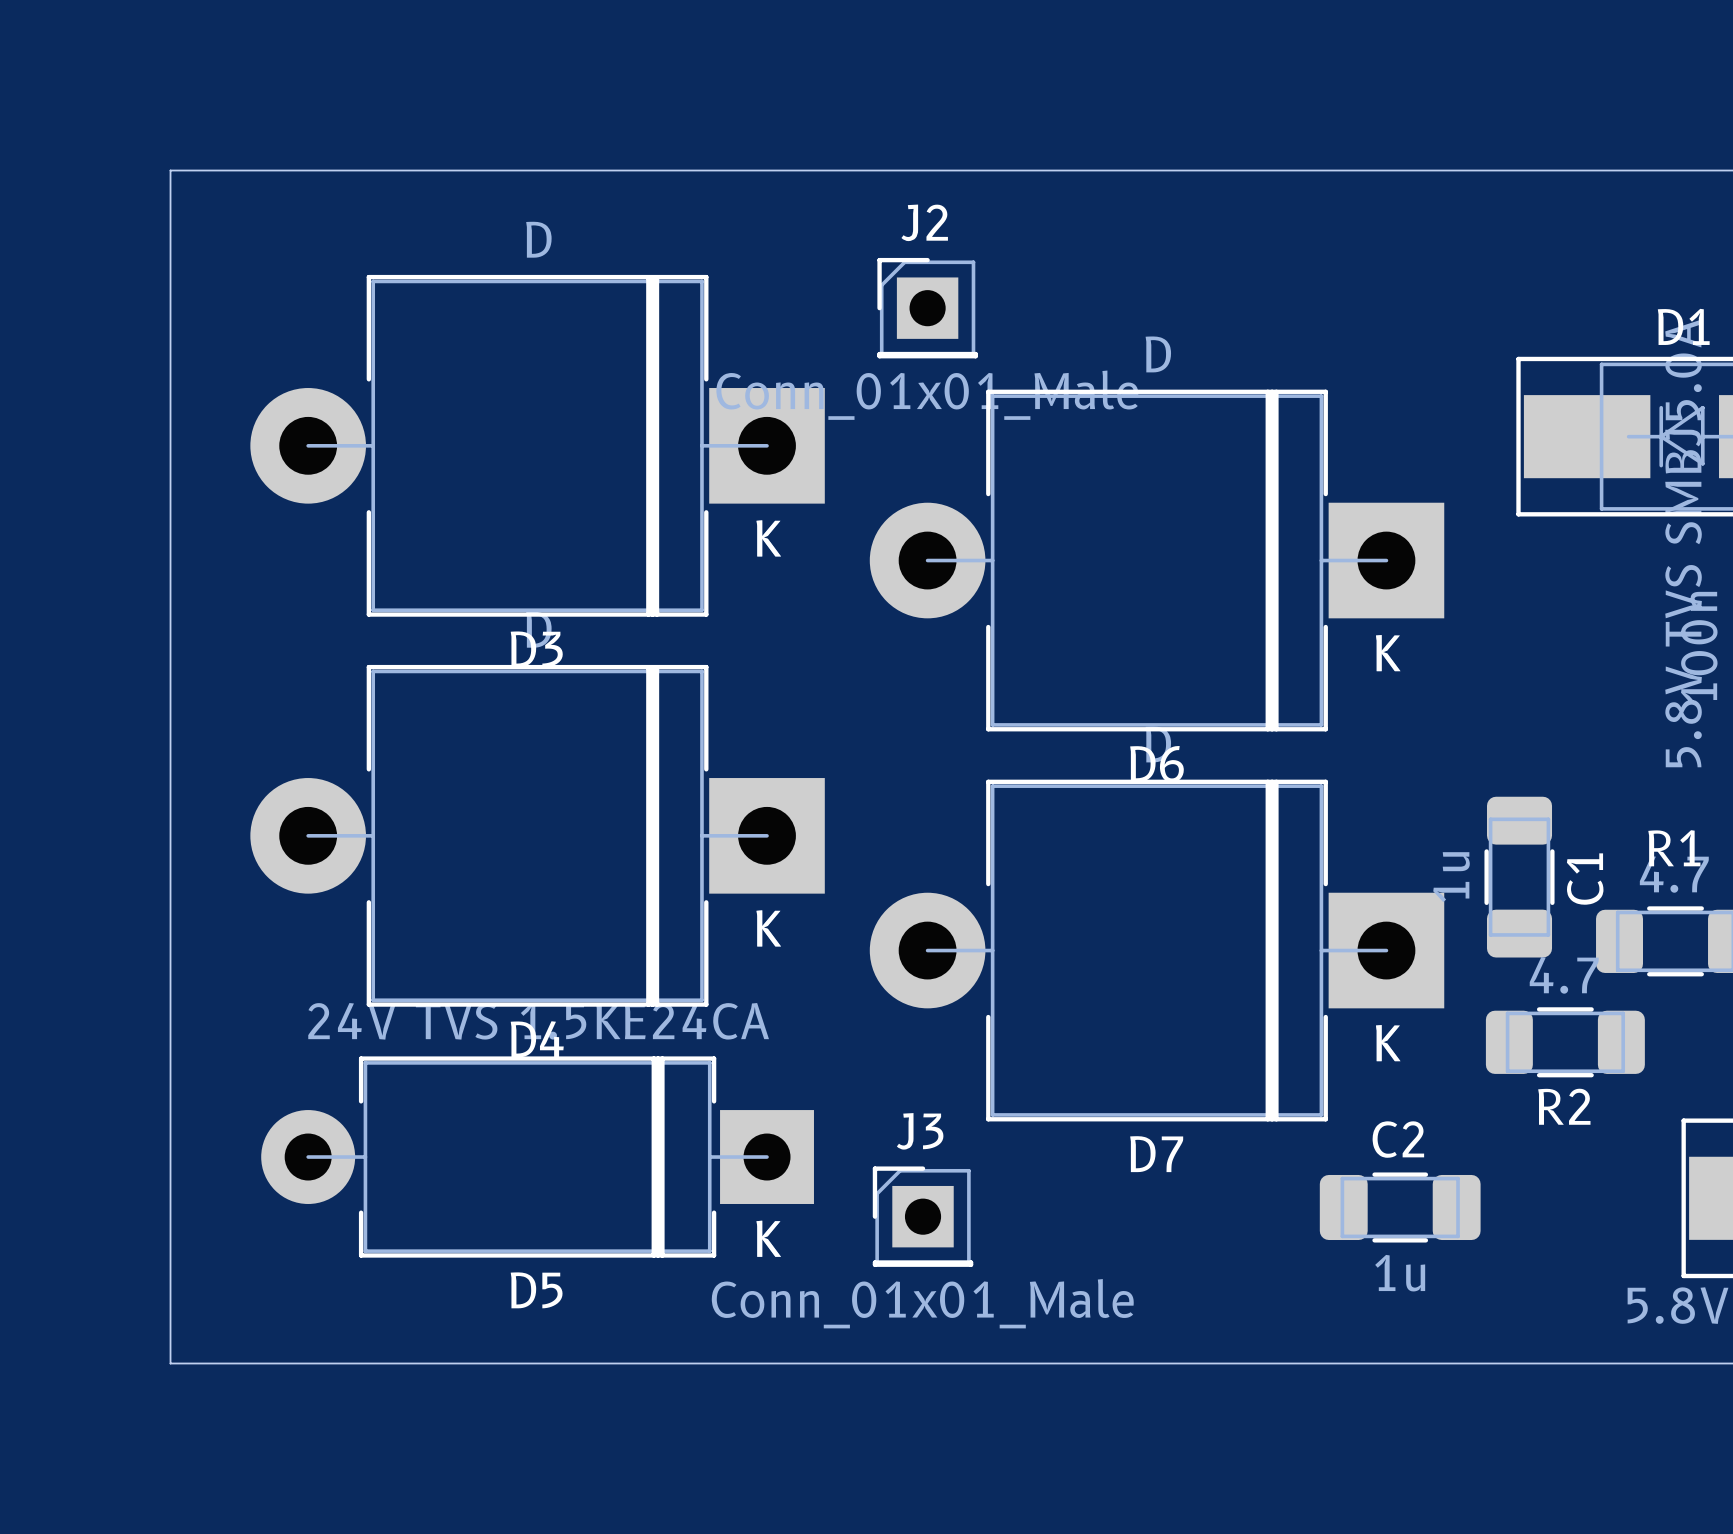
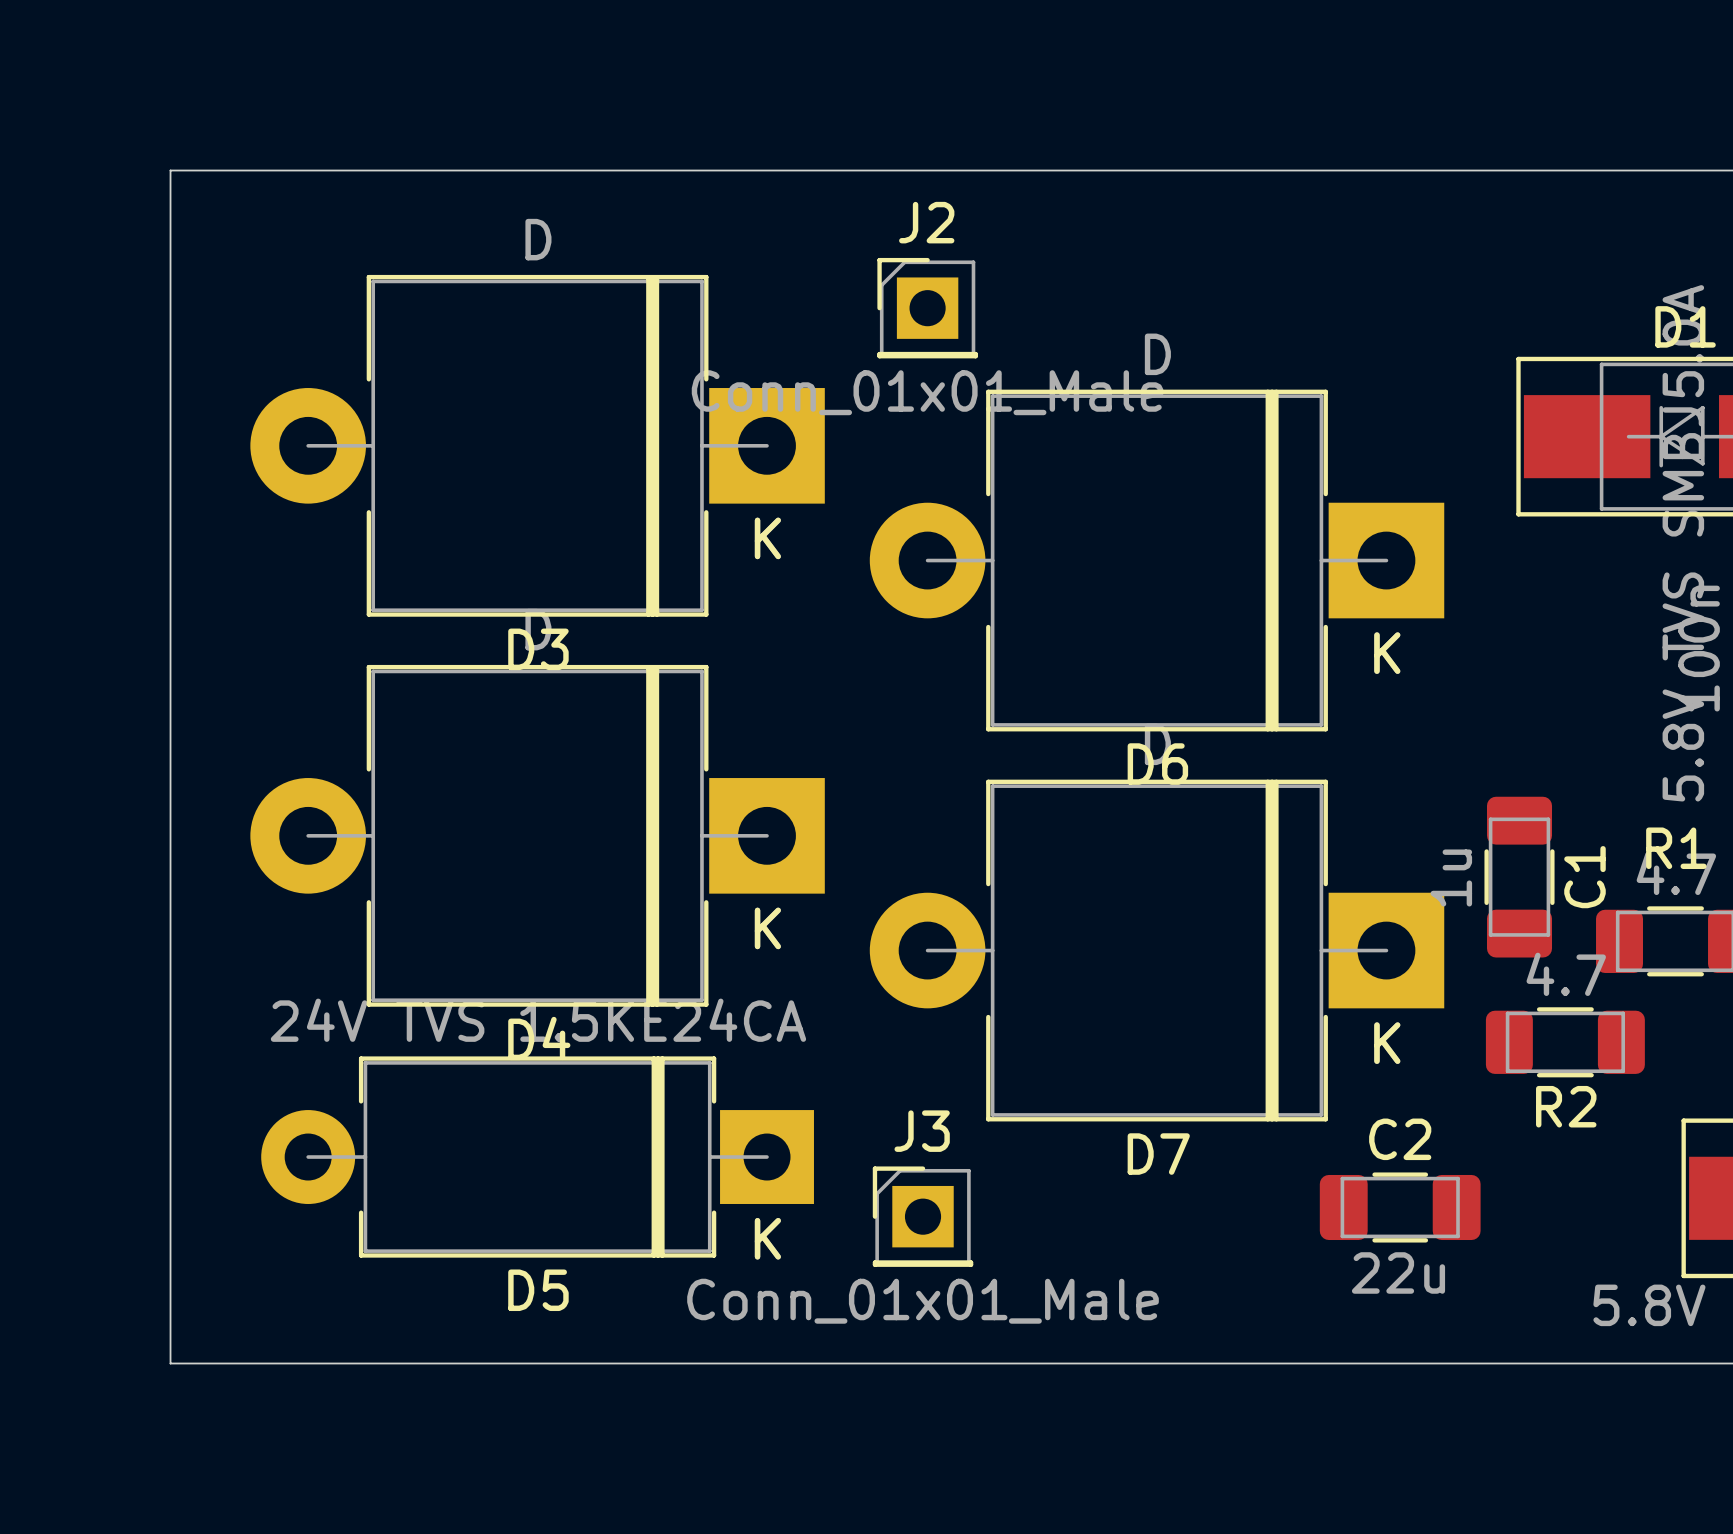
C2 value: 1u (1400, 1273) -> 22u (1398, 1272)

